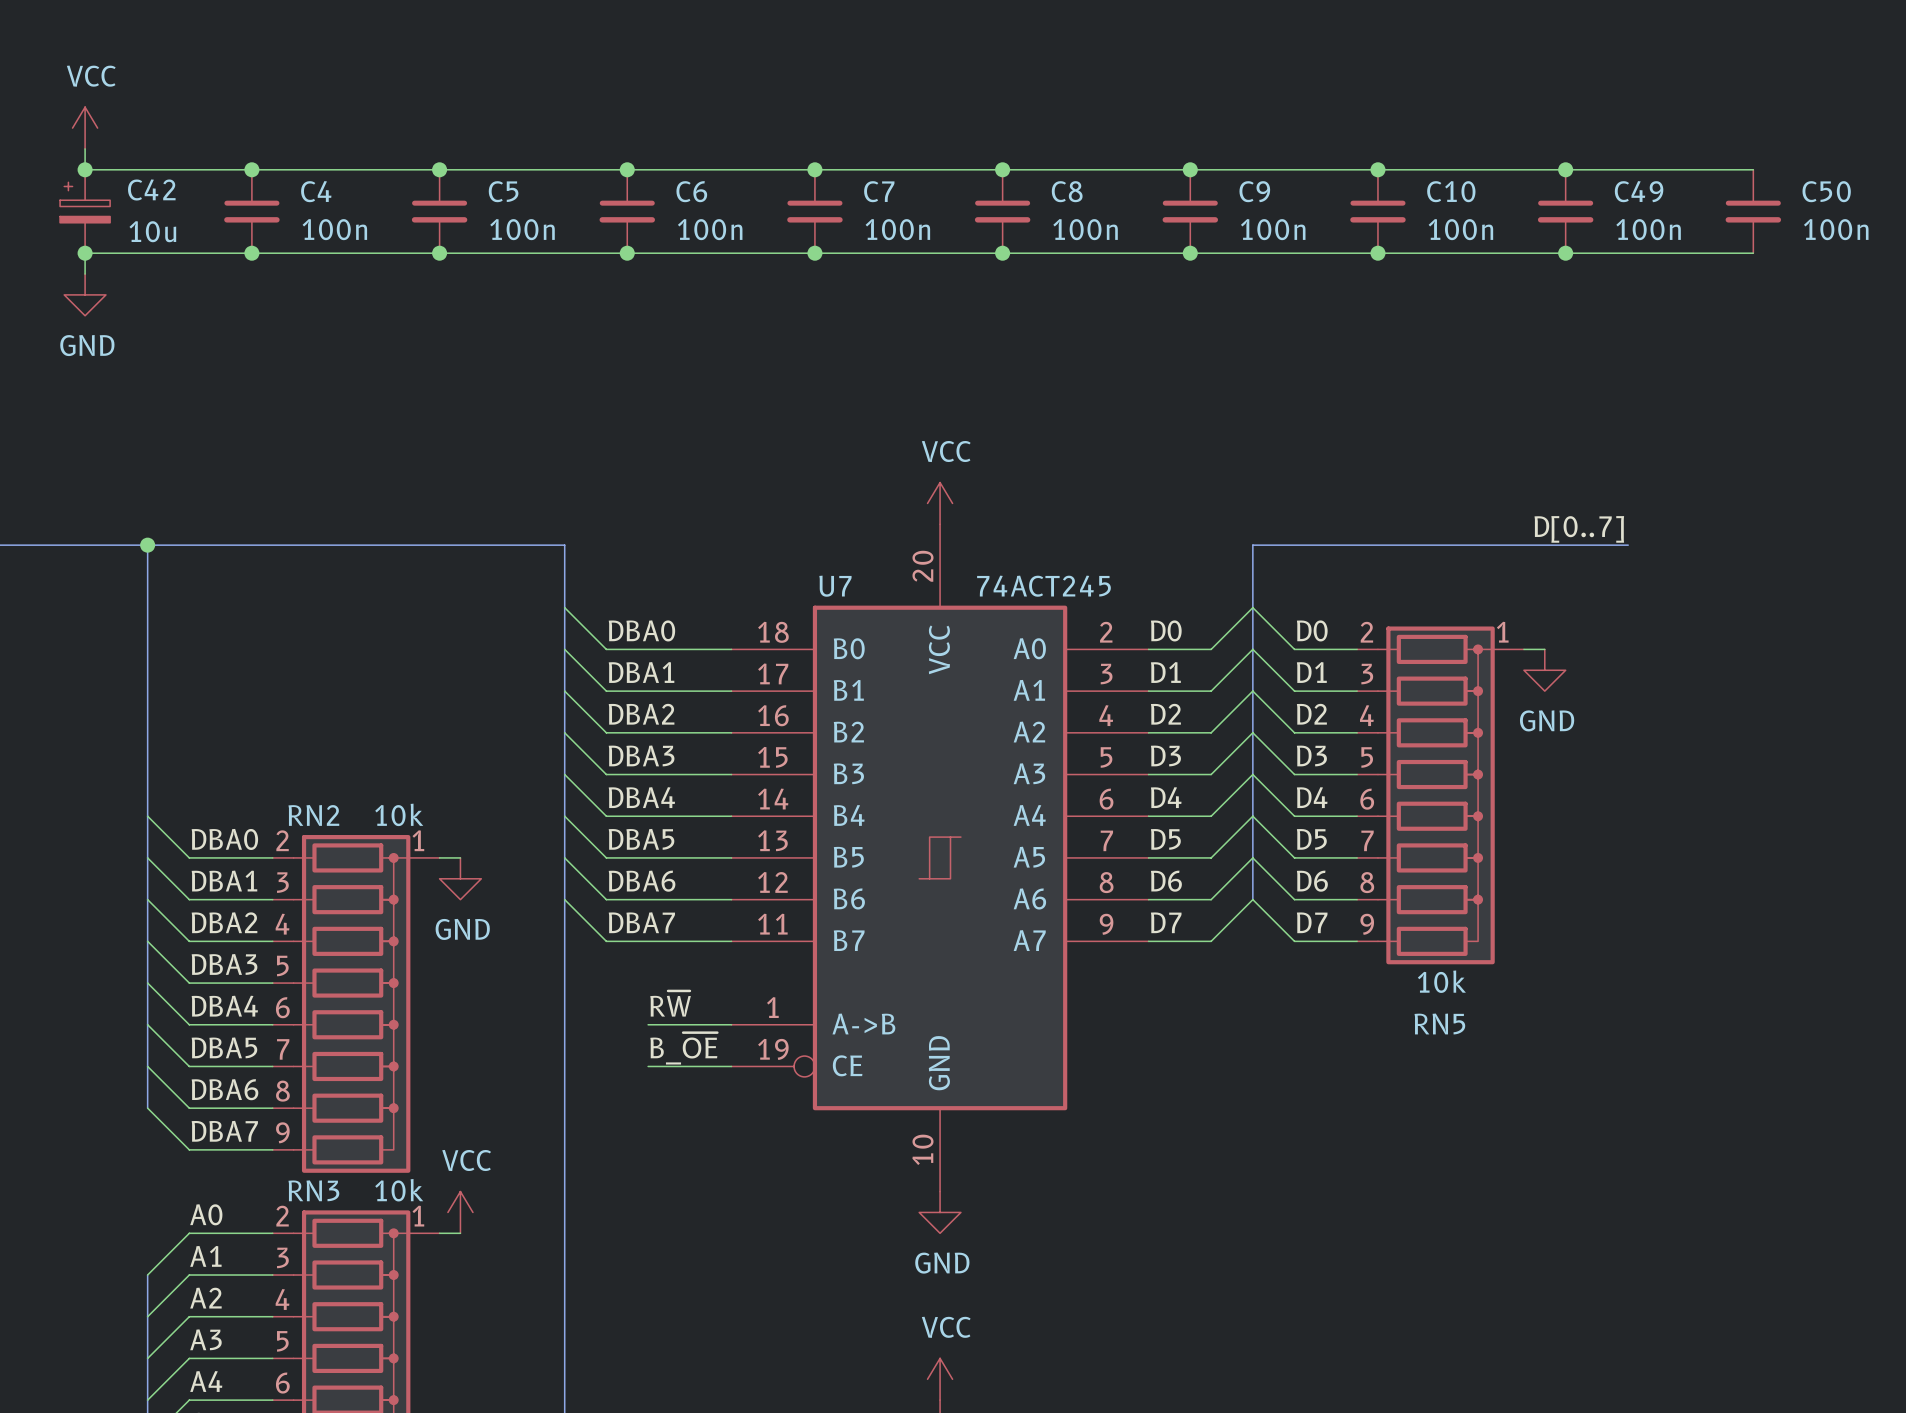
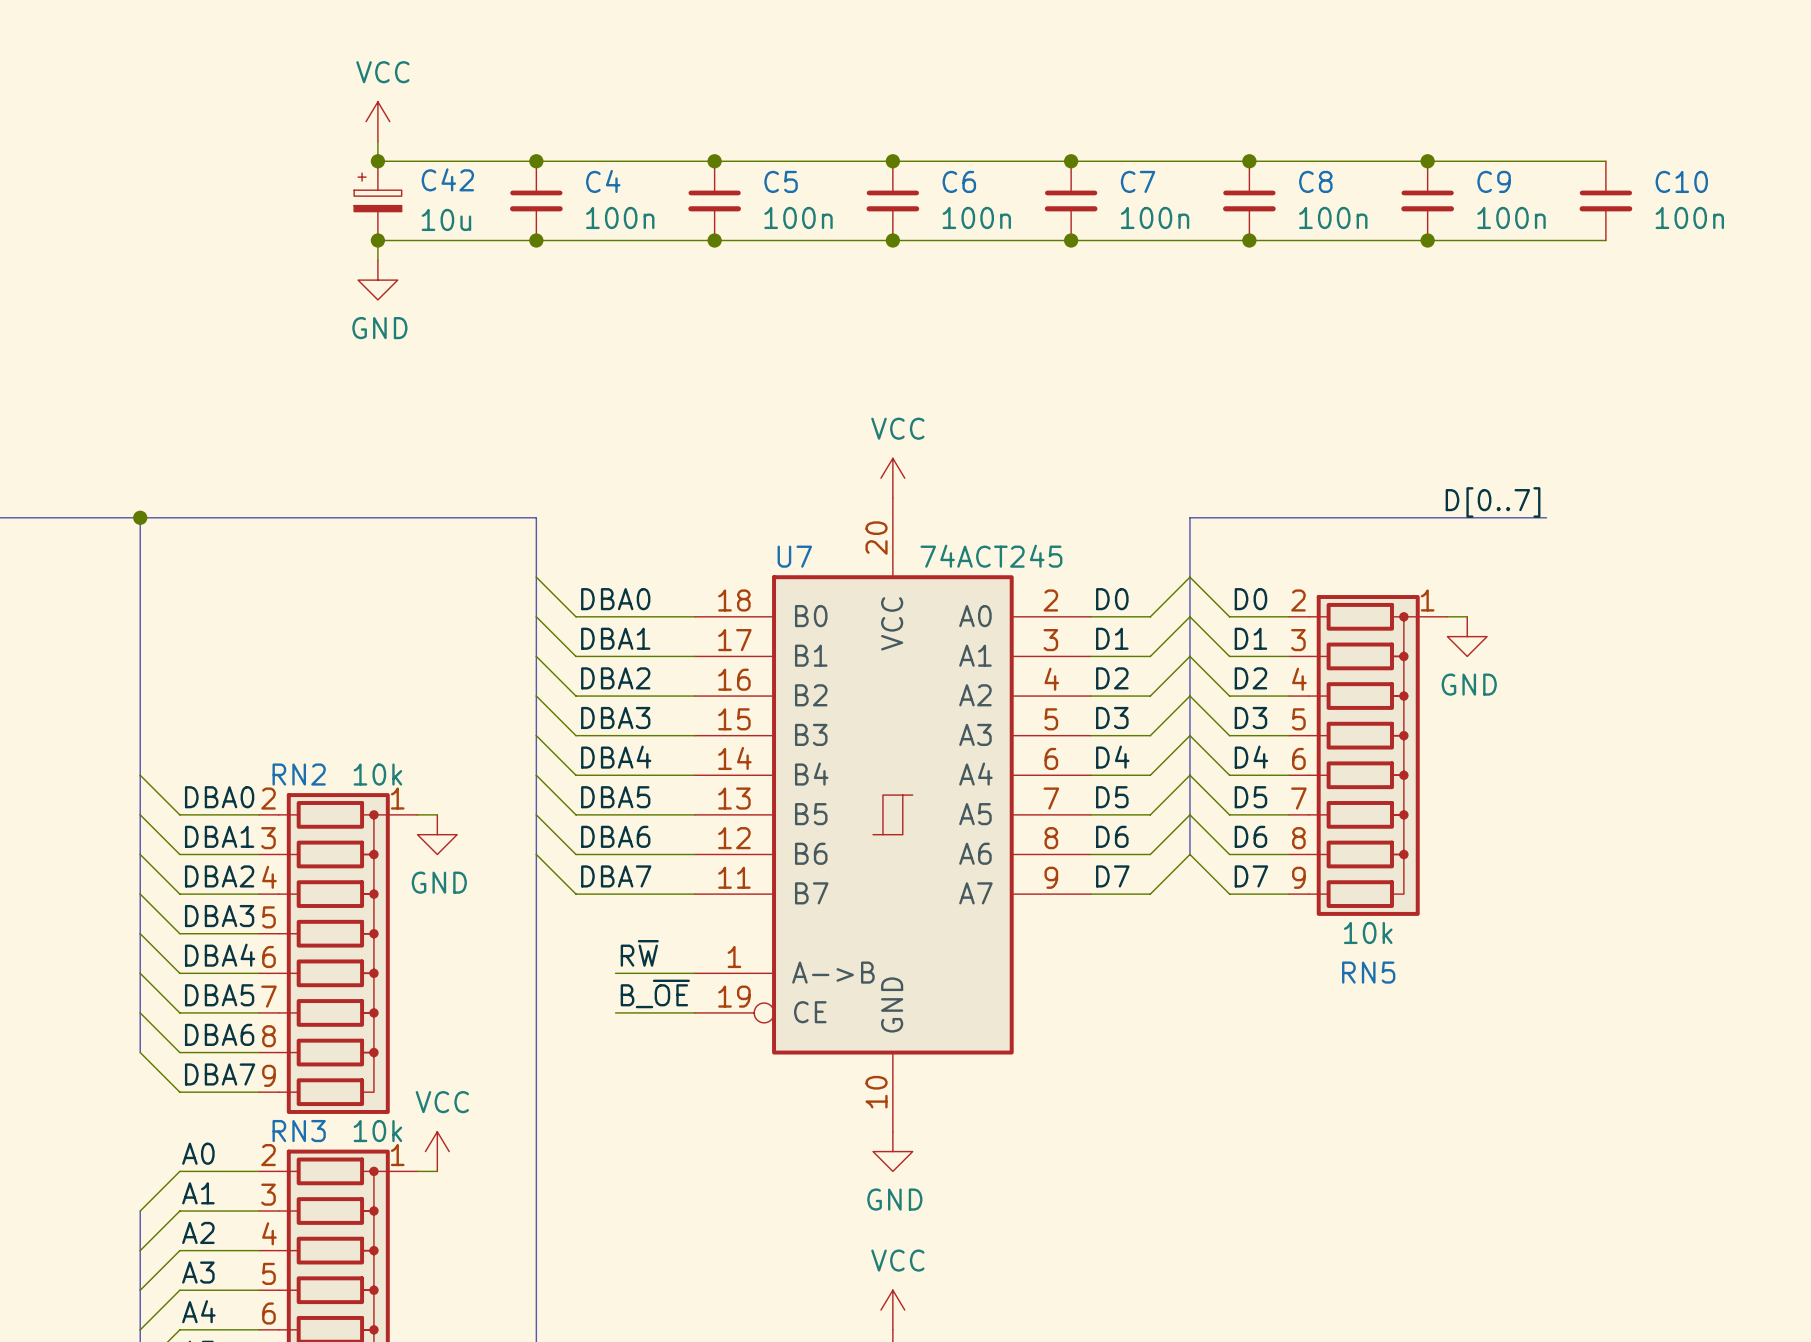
power symbol position: VCC (85, 128) -> VCC (377, 121)
wire: (85, 148) (85, 169) (397, 169) -> (377, 141) (377, 161)
junction: (85, 169) -> none
junction: (251, 169) -> none
junction position: (439, 169) -> (377, 161)
junction: none -> (536, 161)
junction: (627, 169) -> none
junction: none -> (714, 161)
junction: (814, 169) -> none
junction: none -> (892, 161)
junction: (1002, 169) -> none
junction: none -> (1071, 161)
junction: (1190, 169) -> none
junction: none -> (1249, 161)
junction: (1377, 169) -> none
junction: none -> (1427, 161)
junction: (1565, 169) -> none
wire: (1690, 169) (1753, 169) -> none
C42 position: (85, 211) -> (377, 200)
C4 position: (251, 211) -> (536, 200)
C5 position: (439, 211) -> (714, 200)
C6 position: (627, 211) -> (892, 200)
C7 position: (814, 211) -> (1071, 200)
C8 position: (1002, 211) -> (1249, 200)
C9 position: (1190, 211) -> (1427, 200)
C10 position: (1377, 211) -> (1605, 200)
C49: 100n (1565, 211) -> none
C50: 100n (1753, 211) -> none
junction: (85, 253) -> none
junction: (251, 253) -> none
wire: (397, 253) (85, 253) (85, 274) -> (377, 240) (377, 260)
junction position: (439, 253) -> (377, 240)
junction: none -> (536, 240)
junction: (627, 253) -> none
junction: none -> (714, 240)
junction: (814, 253) -> none
junction: none -> (892, 240)
junction: (1002, 253) -> none
junction: none -> (1071, 240)
junction: (1190, 253) -> none
junction: none -> (1249, 240)
junction: (1377, 253) -> none
junction: none -> (1427, 240)
junction: (1565, 253) -> none
wire: (1690, 253) (1753, 253) -> none
power symbol position: GND (85, 294) -> GND (377, 280)

